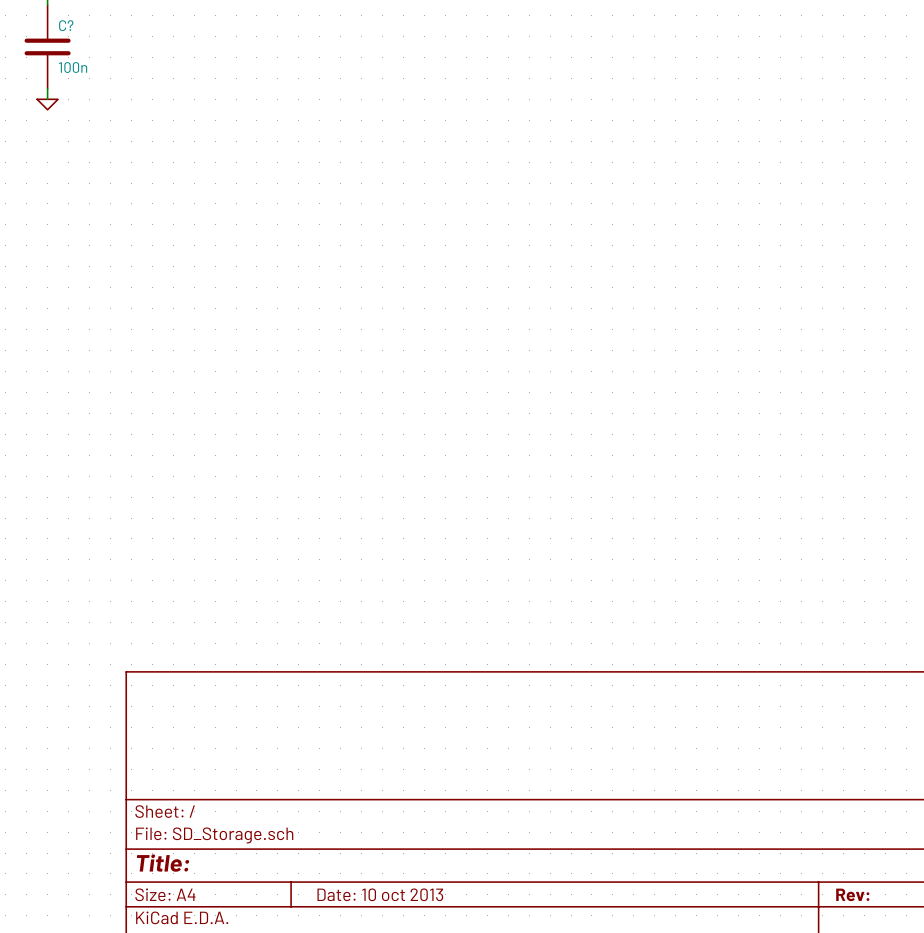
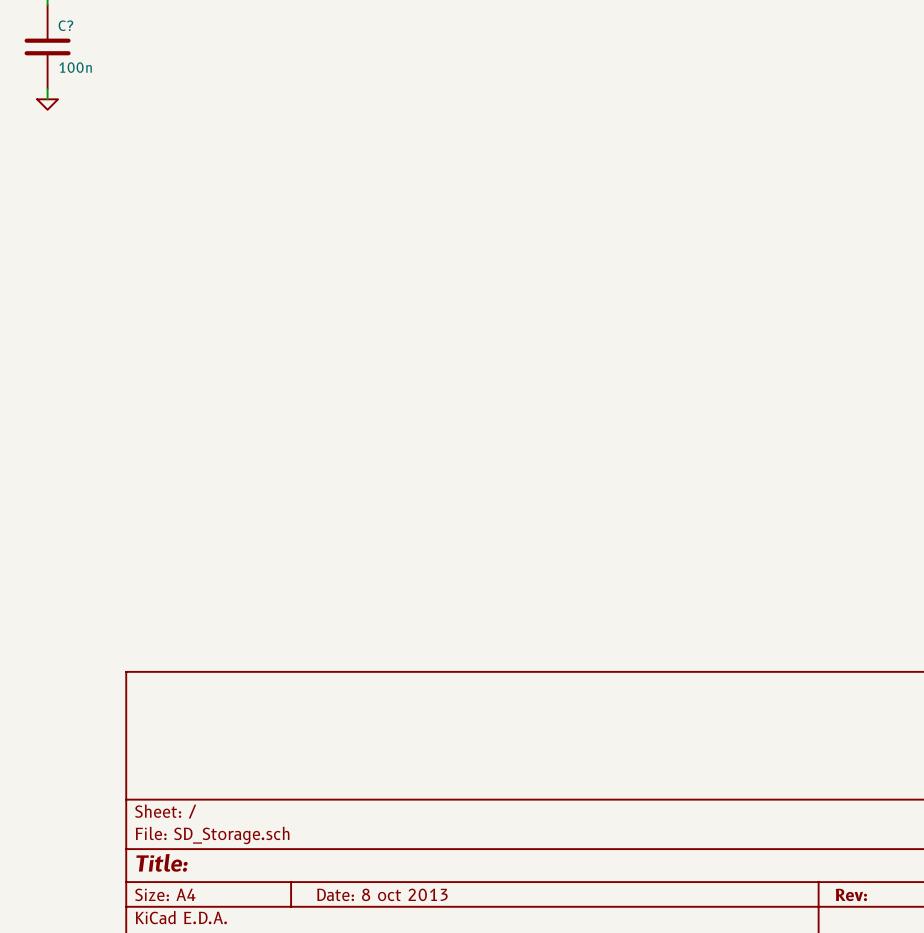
title block: Date: 10 oct 2013 (380, 894) -> Date: 8 oct 2013 (382, 894)

